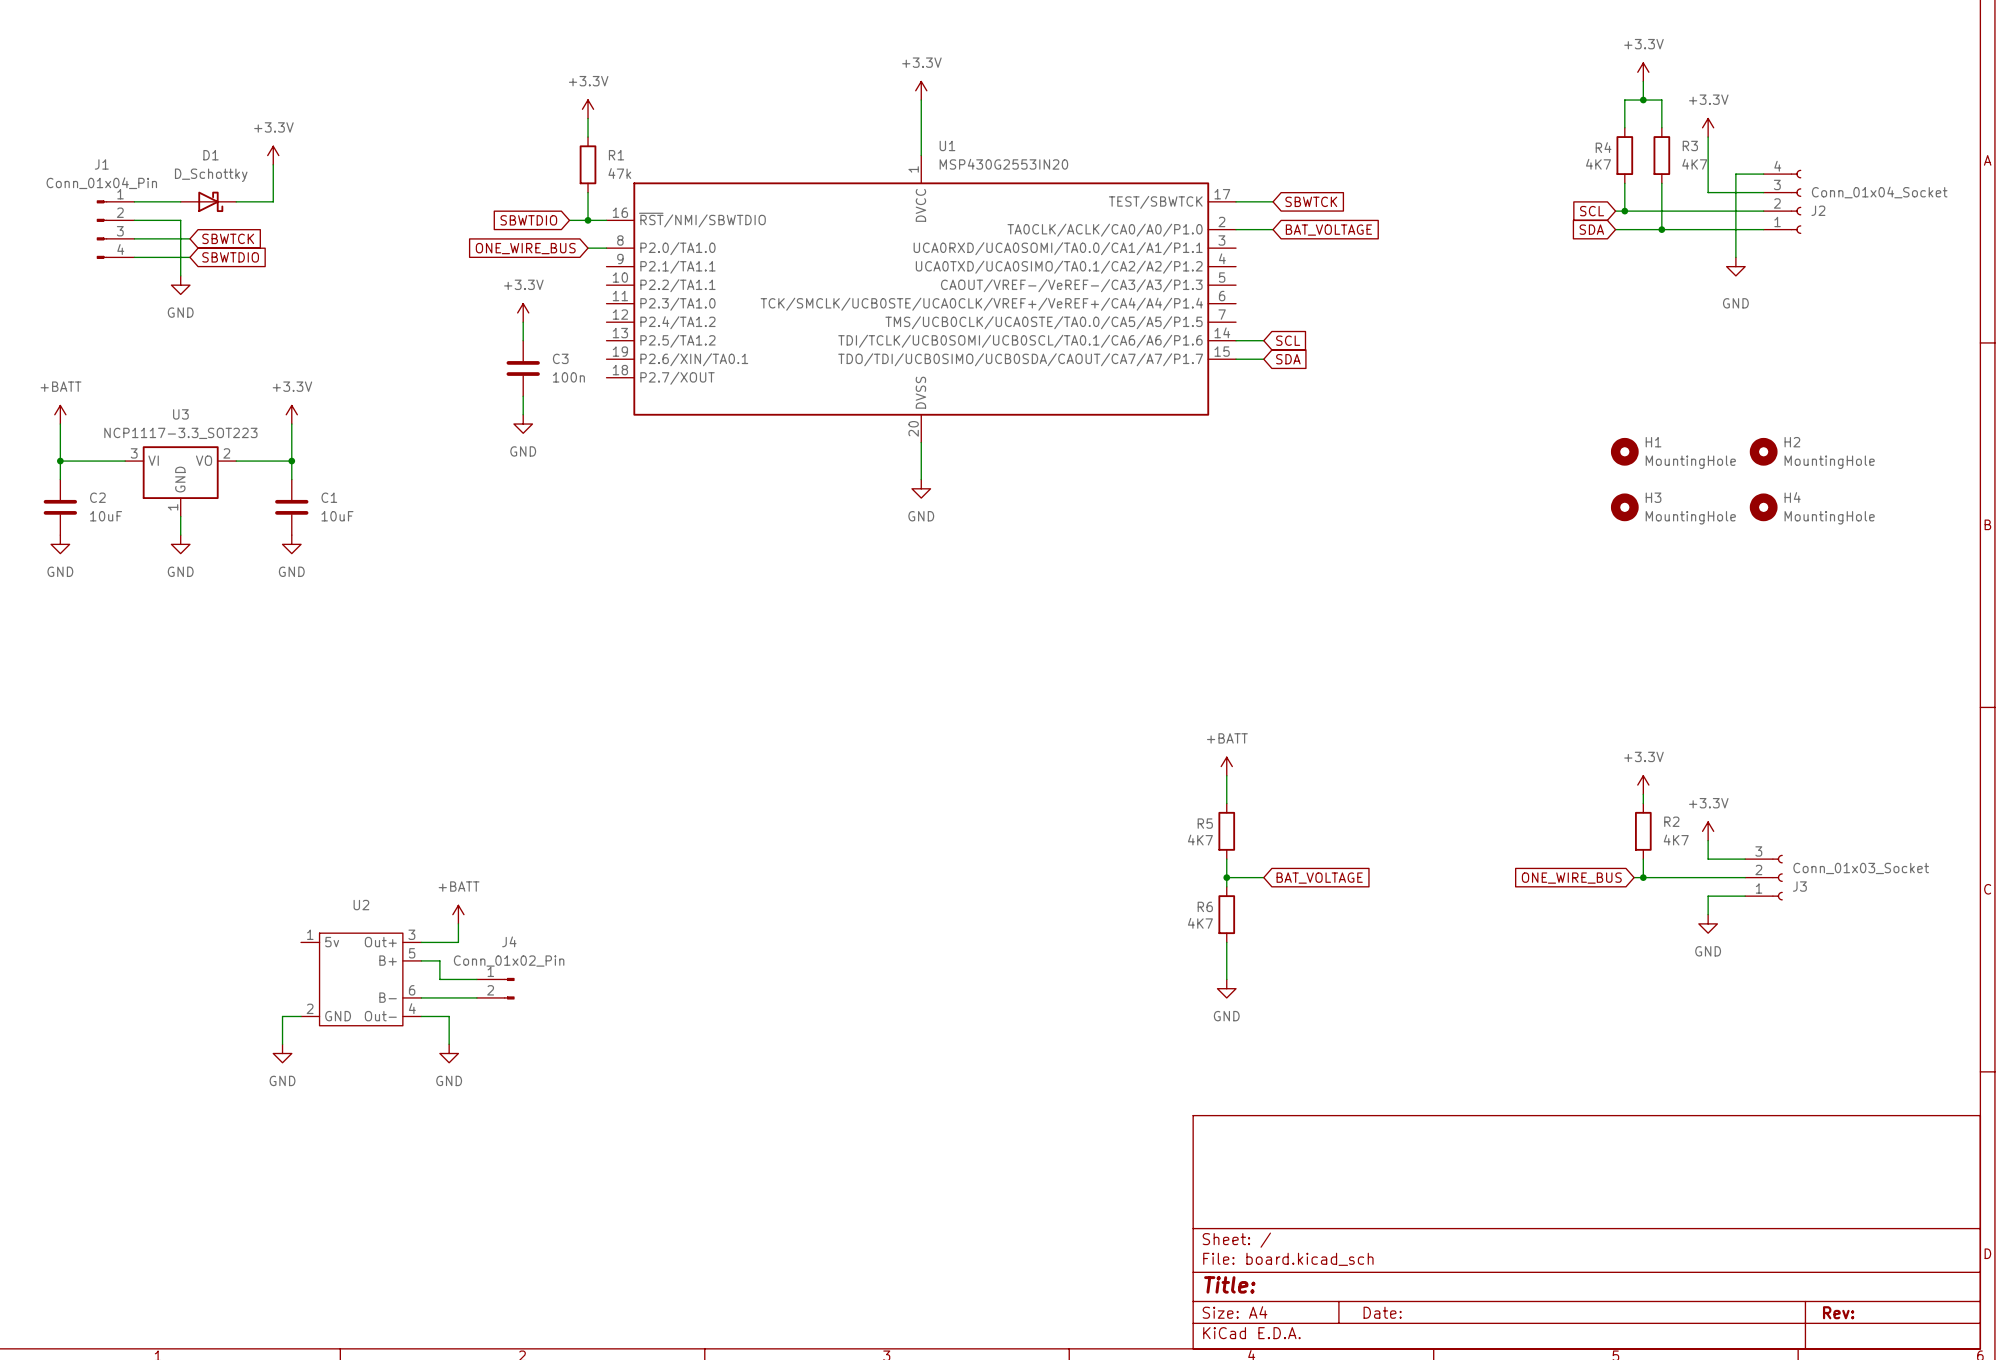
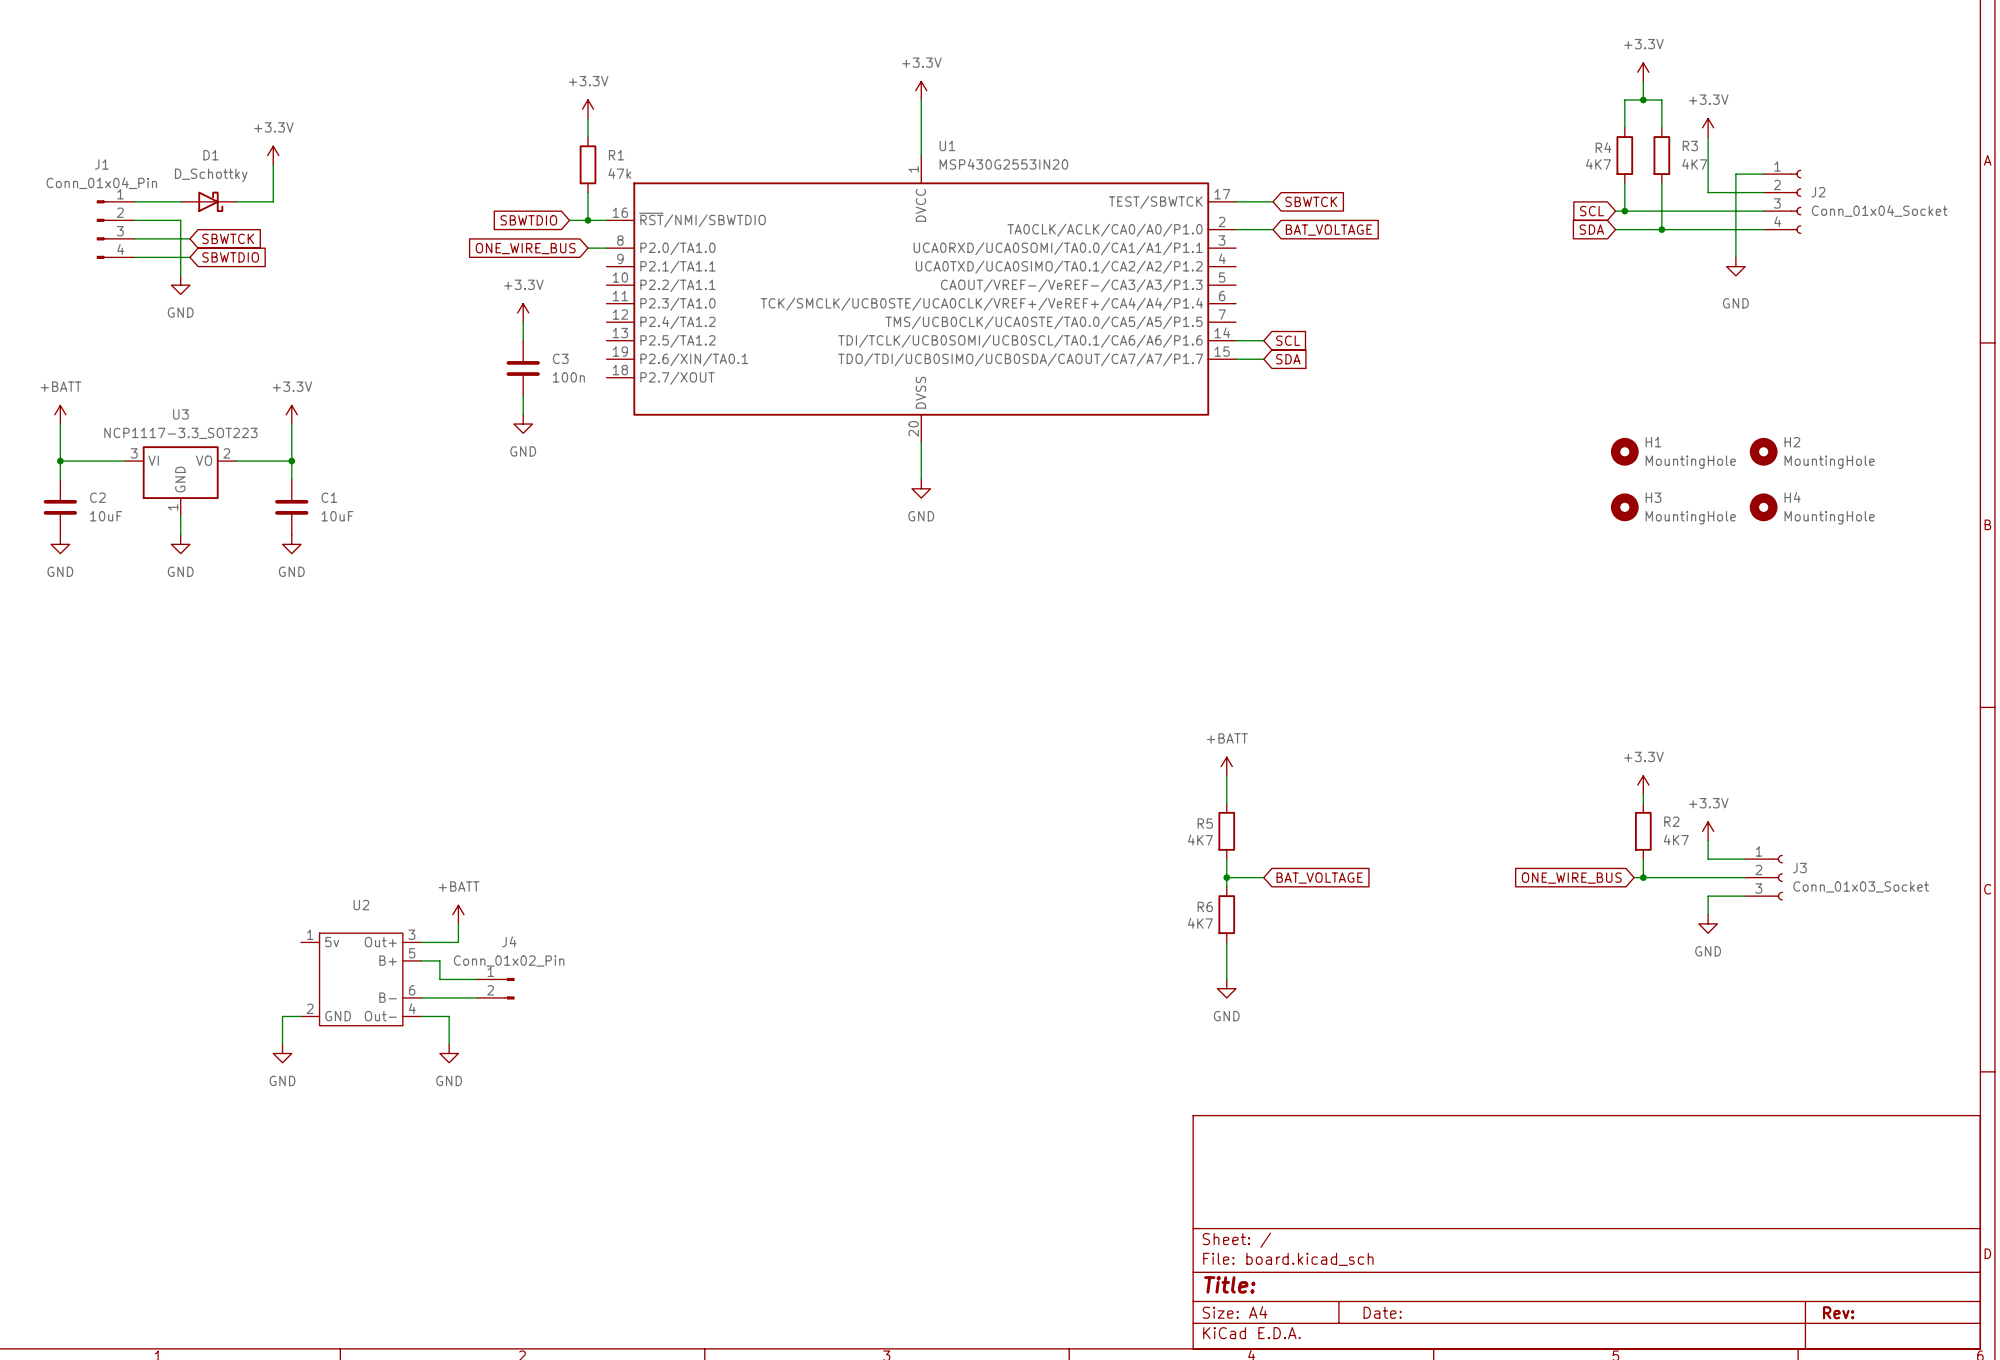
J2 flip: as is (1796, 201) -> up-down (1796, 201)
J3 flip: as is (1777, 877) -> up-down (1777, 877)

